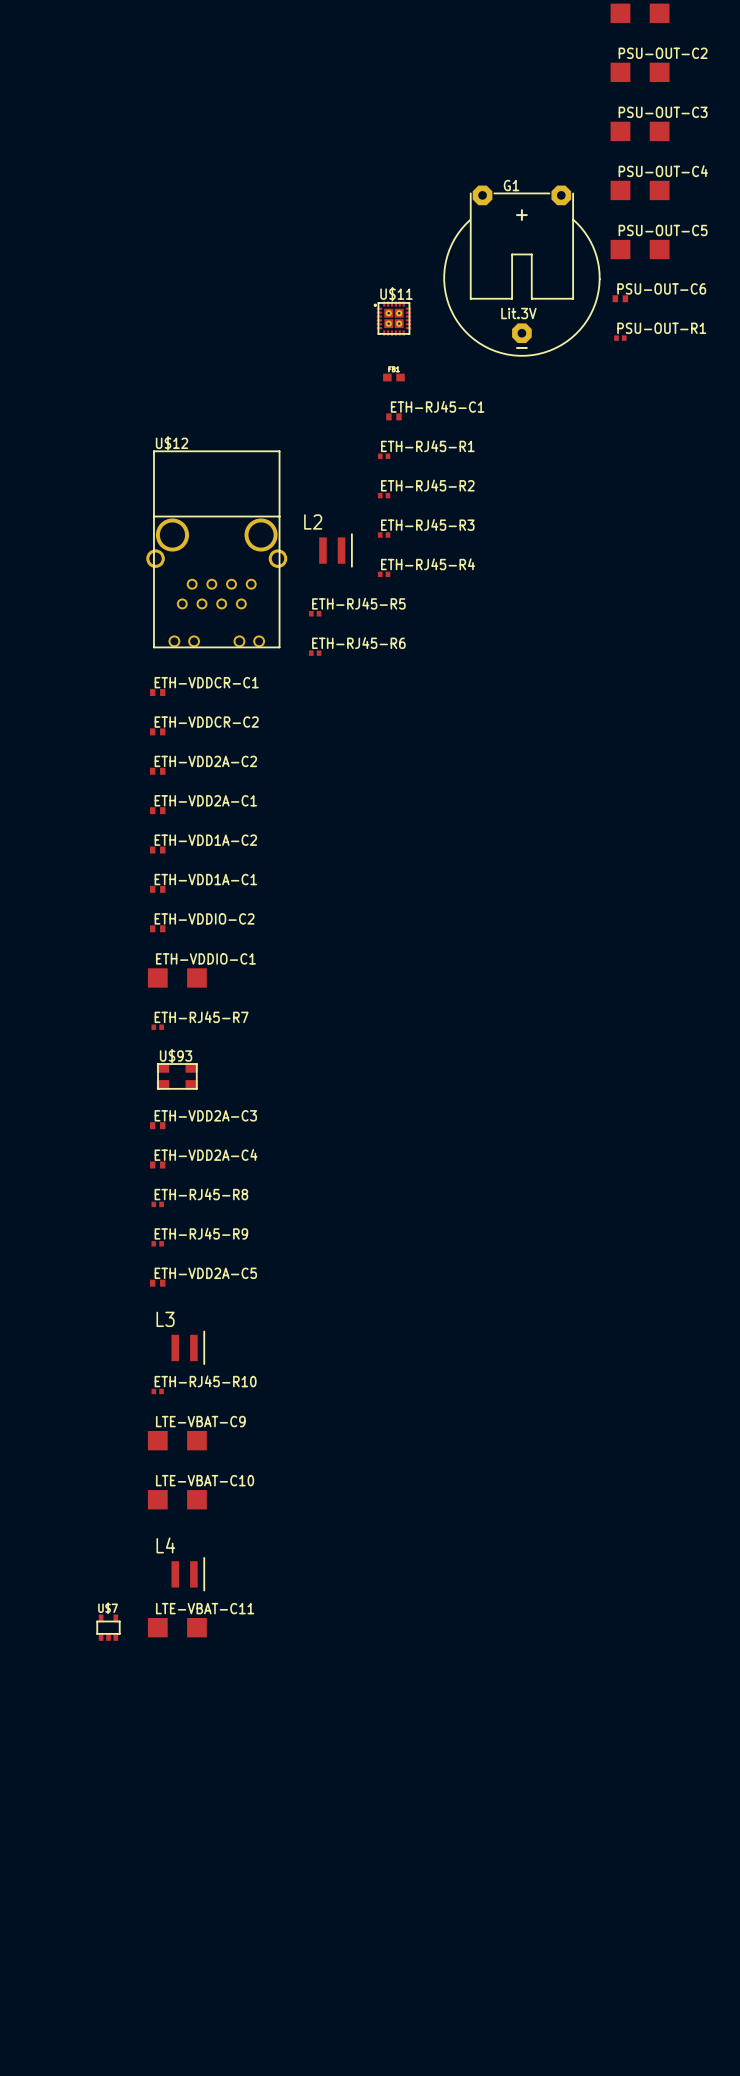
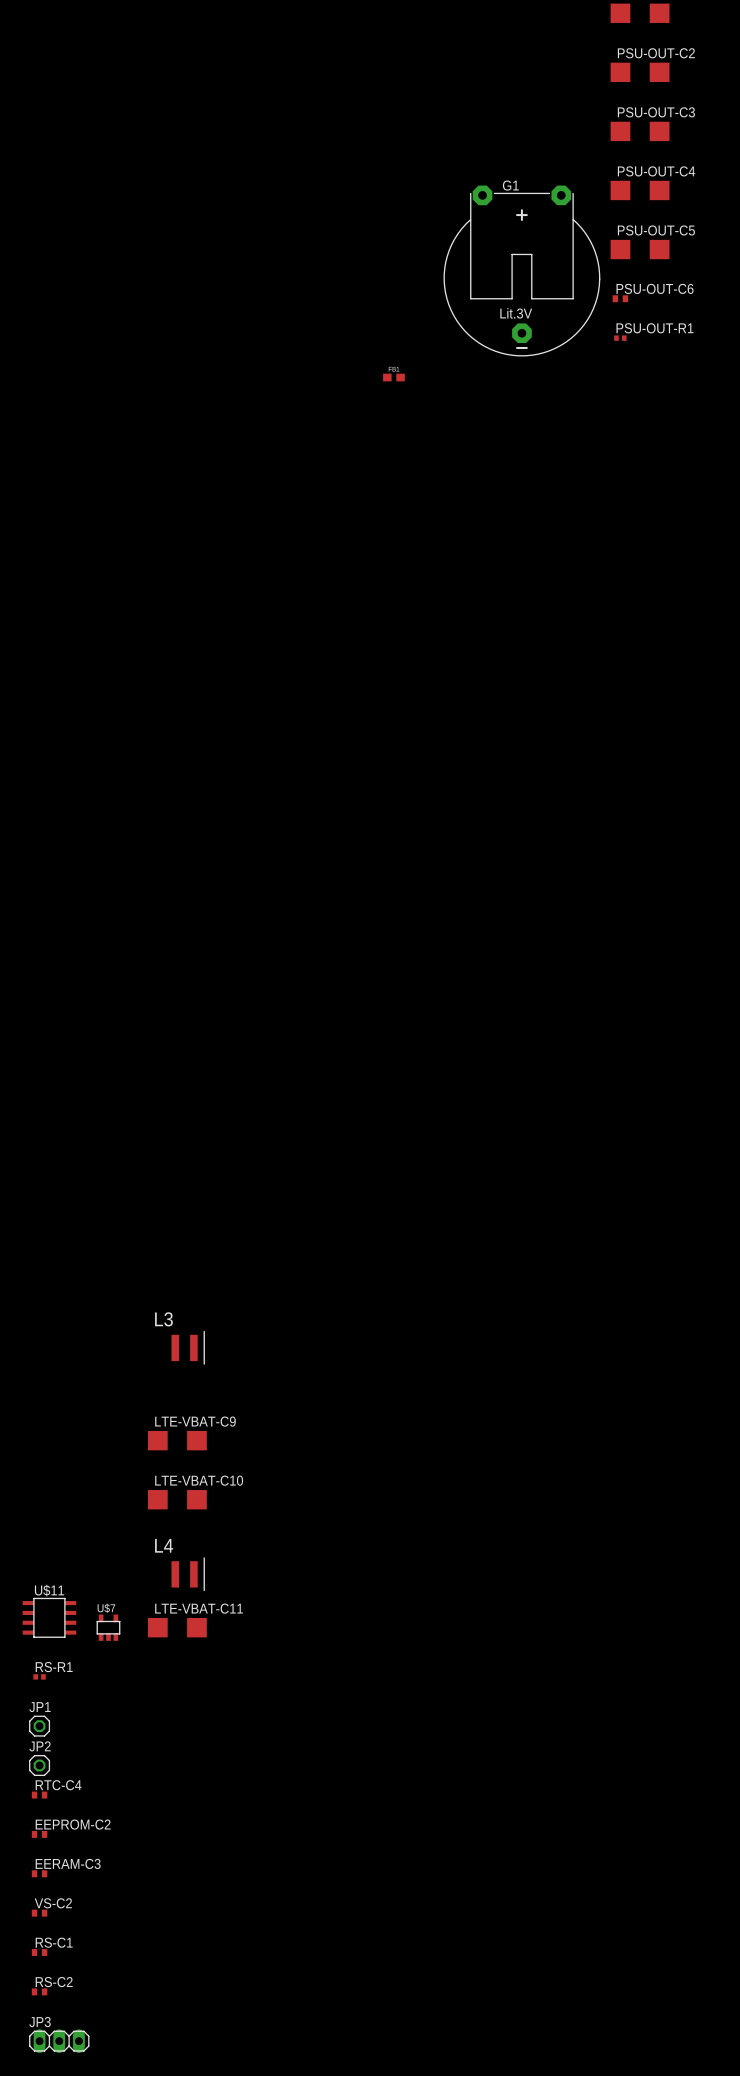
U$11 footprint: [373, 301, 412, 336] -> [22, 1597, 77, 1638]
ETH-RJ45-C1: (393, 416) -> none
ETH-RJ45-R1: (384, 456) -> none
ETH-RJ45-R2: (384, 495) -> none
ETH-RJ45-R3: (384, 535) -> none
U$12: (216, 549) -> none
L2: (335, 550) -> none
ETH-RJ45-R4: (384, 574) -> none
ETH-RJ45-R5: (315, 613) -> none
ETH-RJ45-R6: (315, 653) -> none
ETH-VDDCR-C1: (157, 692) -> none
ETH-VDDCR-C2: (157, 731) -> none
ETH-VDD2A-C2: (157, 771) -> none
ETH-VDD2A-C1: (157, 810) -> none
ETH-VDD1A-C2: (157, 850) -> none
ETH-VDD1A-C1: (157, 889) -> none
ETH-VDDIO-C2: (157, 928) -> none
ETH-VDDIO-C1: (177, 977) -> none
ETH-RJ45-R7: (157, 1027) -> none
U$93: (177, 1076) -> none
ETH-VDD2A-C3: (157, 1125) -> none
ETH-VDD2A-C4: (157, 1165) -> none
ETH-RJ45-R8: (157, 1204) -> none
ETH-RJ45-R9: (157, 1243) -> none
ETH-VDD2A-C5: (157, 1283) -> none
ETH-RJ45-R10: (157, 1391) -> none
RS-R1: none -> (39, 1676)
JP1: none -> (39, 1726)
JP2: none -> (39, 1765)
RTC-C4: none -> (39, 1795)
EEPROM-C2: none -> (39, 1834)
EERAM-C3: none -> (39, 1873)
VS-C2: none -> (39, 1913)
RS-C1: none -> (39, 1952)
RS-C2: none -> (39, 1991)
JP3: none -> (59, 2041)

